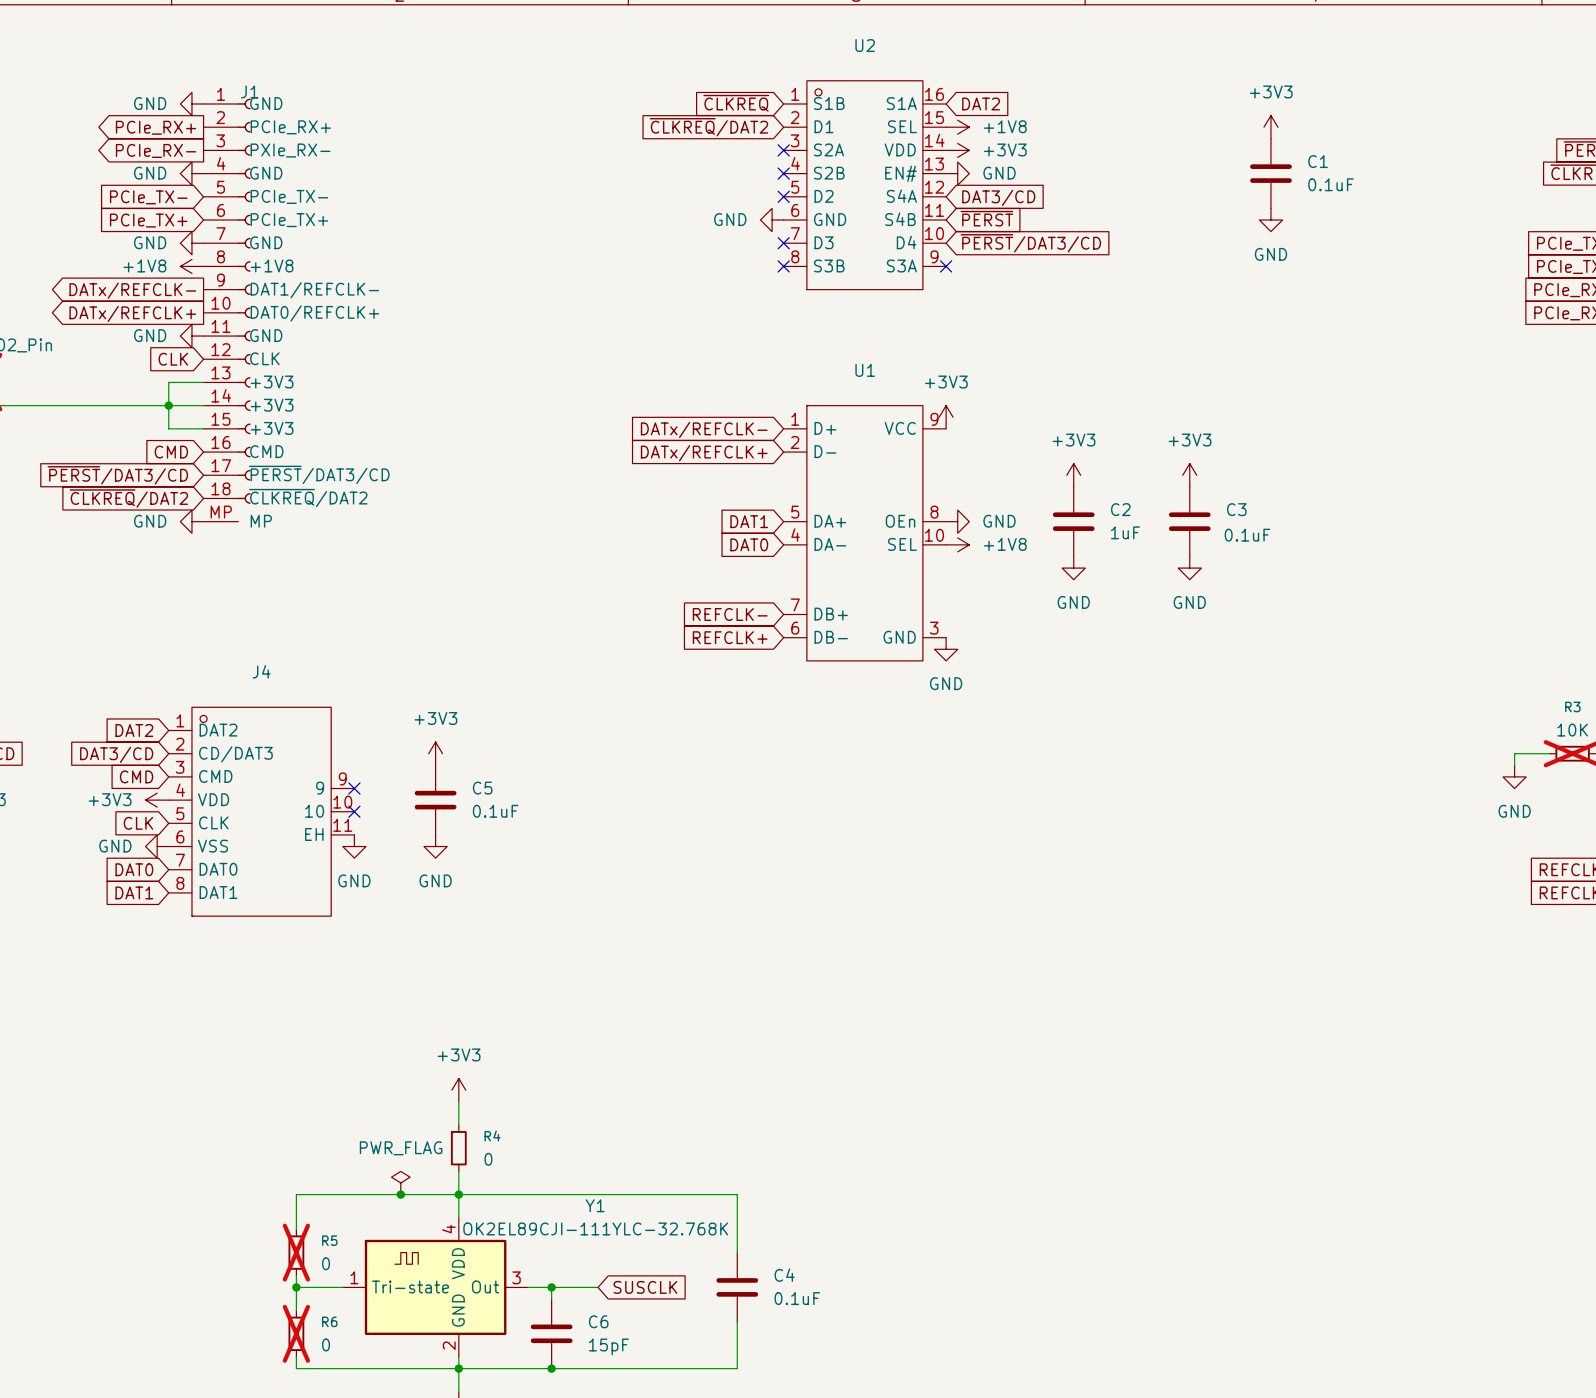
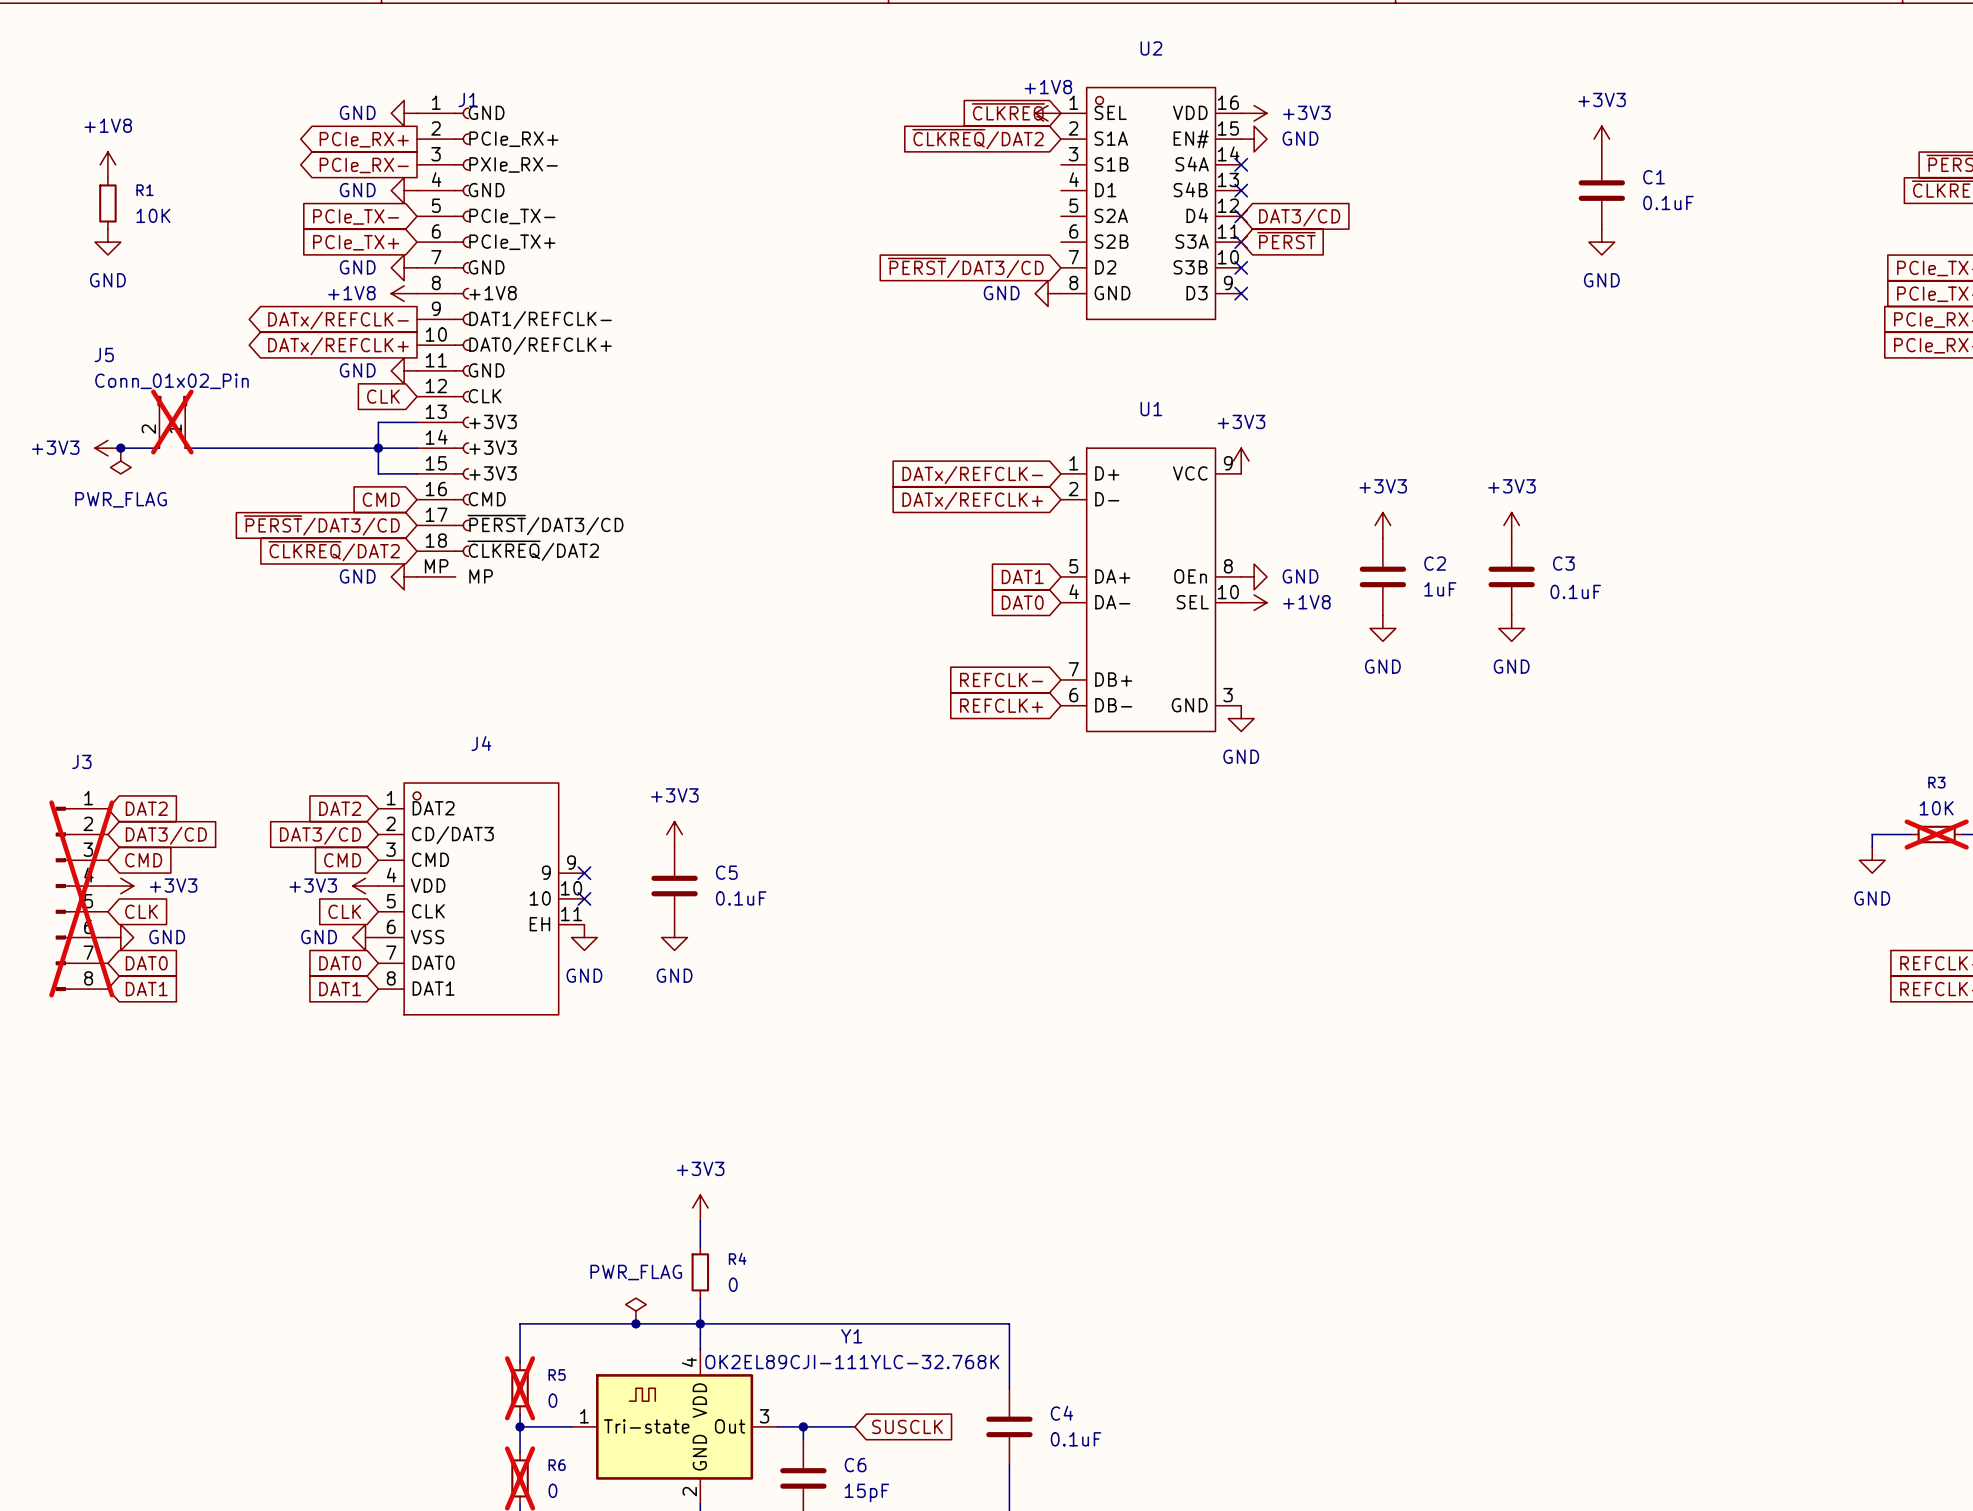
U2 symbol: [783, 80, 947, 290] -> [1060, 87, 1242, 320]
power symbol: none -> +1V8 (1048, 113)
global label: DAT2 (981, 103) -> none
power symbol: +1V8 (957, 127) -> GND (1254, 139)
no-connect mark: (783, 150) -> none
no-connect mark: none -> (1241, 164)
power symbol position: +3V3 (957, 150) -> +3V3 (1254, 113)
no-connect mark: (783, 173) -> none
no-connect mark: none -> (1241, 190)
power symbol: GND (957, 173) -> none
no-connect mark: (783, 196) -> none
no-connect mark: none -> (1241, 216)
power symbol position: GND (772, 220) -> GND (1048, 293)
no-connect mark: none -> (1241, 242)
no-connect mark: (783, 243) -> none
no-connect mark: none -> (1241, 267)
global label rotation: 0° (1030, 243) -> 180° (965, 267)
global label position: ~{PERST}/DAT3/CD (1030, 243) -> ~{PERST}/DAT3/CD (965, 267)
no-connect mark: (783, 266) -> none

